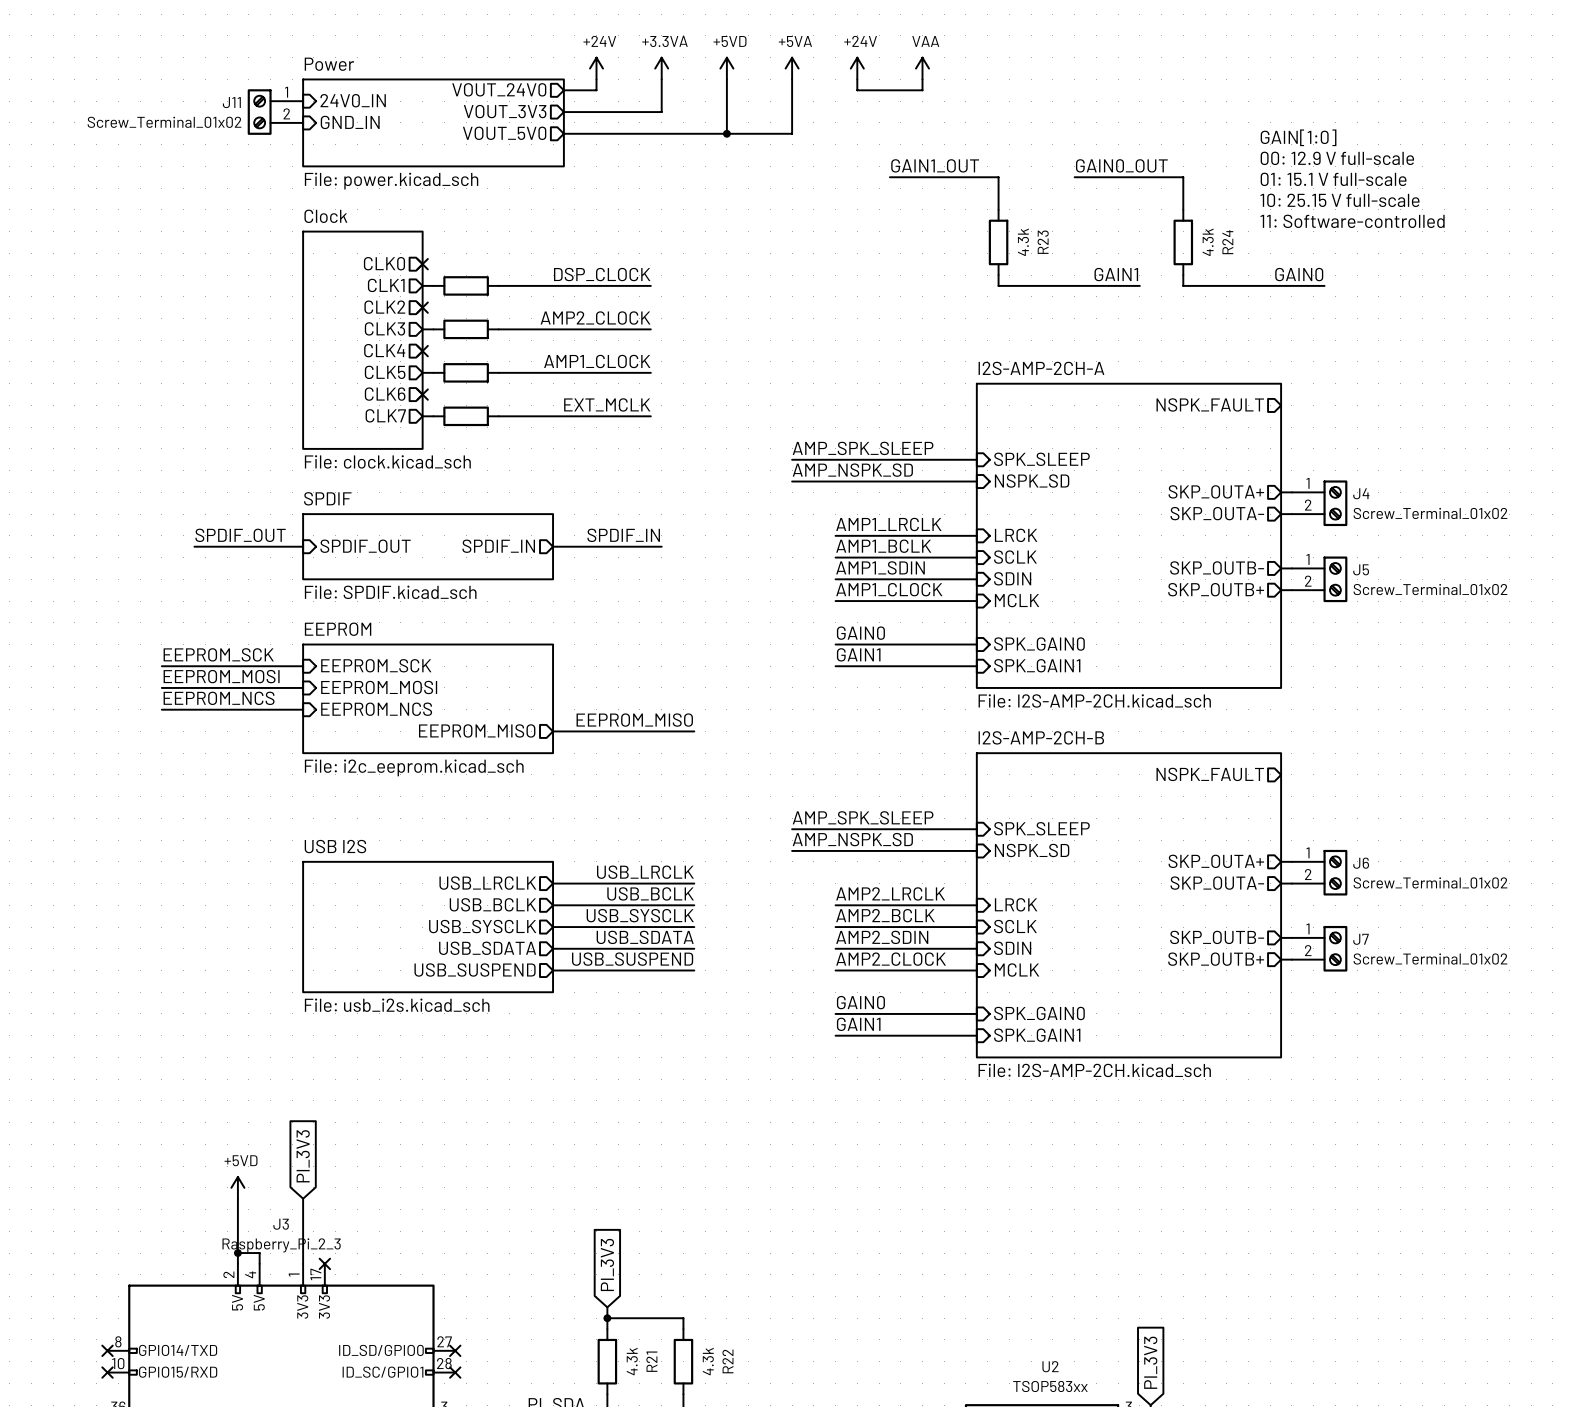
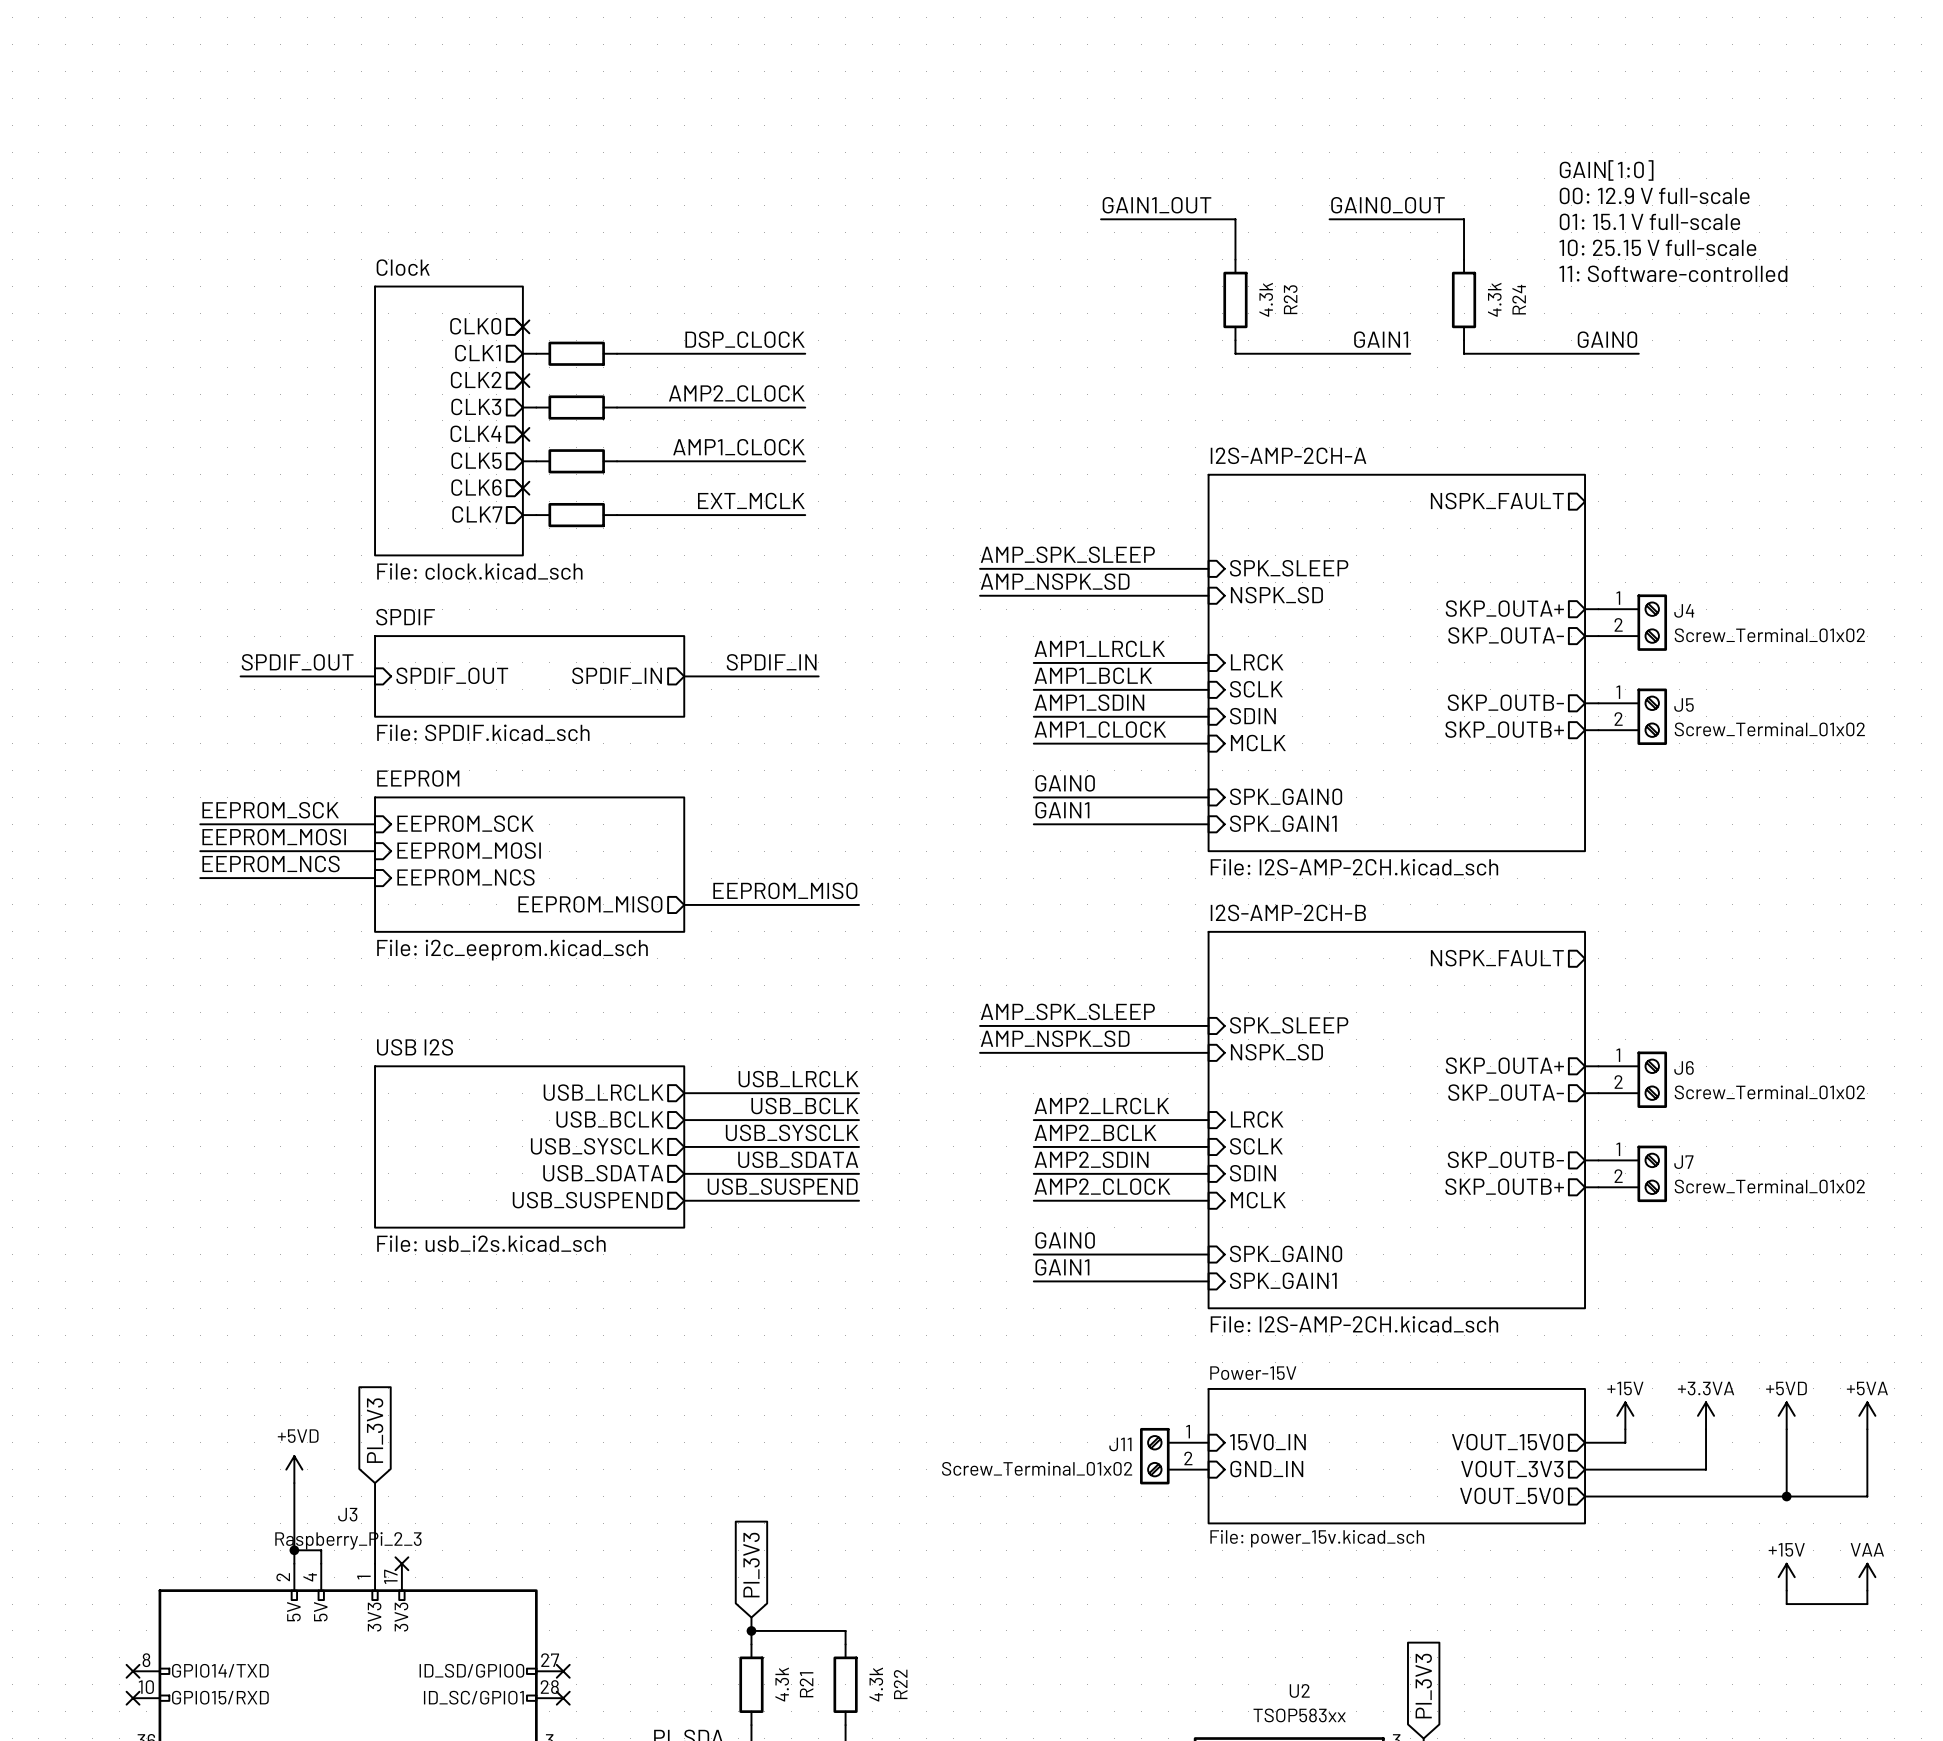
power symbol: +24V (596, 68) -> none
power symbol: +3.3VA (661, 68) -> none
power symbol: +5VD (726, 68) -> none
power symbol: +5VA (792, 68) -> none
power symbol: +24V (857, 68) -> none
power symbol: VAA (922, 68) -> none
wire: (596, 79) (596, 90) (563, 90) -> none
wire: (661, 79) (661, 112) (563, 112) -> none
wire: (726, 79) (726, 133) -> none
wire: (792, 79) (792, 133) (563, 133) -> none
wire: (857, 79) (857, 90) (922, 90) (922, 79) -> none
sheet pin: VOUT_24V0 (499, 89) -> none
sheet pin: 24V0_IN (353, 100) -> none
sheet pin: VOUT_3V3 (505, 111) -> none
J11 position: (275, 112) -> (1174, 1456)
sheet pin: GND_IN (350, 122) -> none
sheet Power: File: power.kicad_sch (433, 122) -> none
sheet pin: VOUT_5V0 (504, 133) -> none
junction: (726, 133) -> none
power symbol: none -> +15V (1625, 1415)
power symbol: none -> +3.3VA (1706, 1415)
power symbol: none -> +5VD (1786, 1415)
power symbol: none -> +5VA (1867, 1415)
wire: none -> (1625, 1429) (1625, 1442) (1585, 1442)
wire: none -> (1706, 1429) (1706, 1469) (1585, 1469)
wire: none -> (1786, 1429) (1786, 1496)
wire: none -> (1867, 1429) (1867, 1496) (1585, 1496)
sheet pin: none -> 15V0_IN (1267, 1442)
sheet pin: none -> VOUT_15V0 (1507, 1442)
sheet Power-15V: none -> File: power_15v.kicad_sch (1396, 1456)
sheet pin: none -> GND_IN (1266, 1469)
sheet pin: none -> VOUT_3V3 (1512, 1469)
sheet pin: none -> VOUT_5V0 (1511, 1495)
junction: none -> (1786, 1496)
power symbol: none -> +15V (1786, 1577)
power symbol: none -> VAA (1867, 1577)
wire: none -> (1786, 1590) (1786, 1604) (1867, 1604) (1867, 1590)

